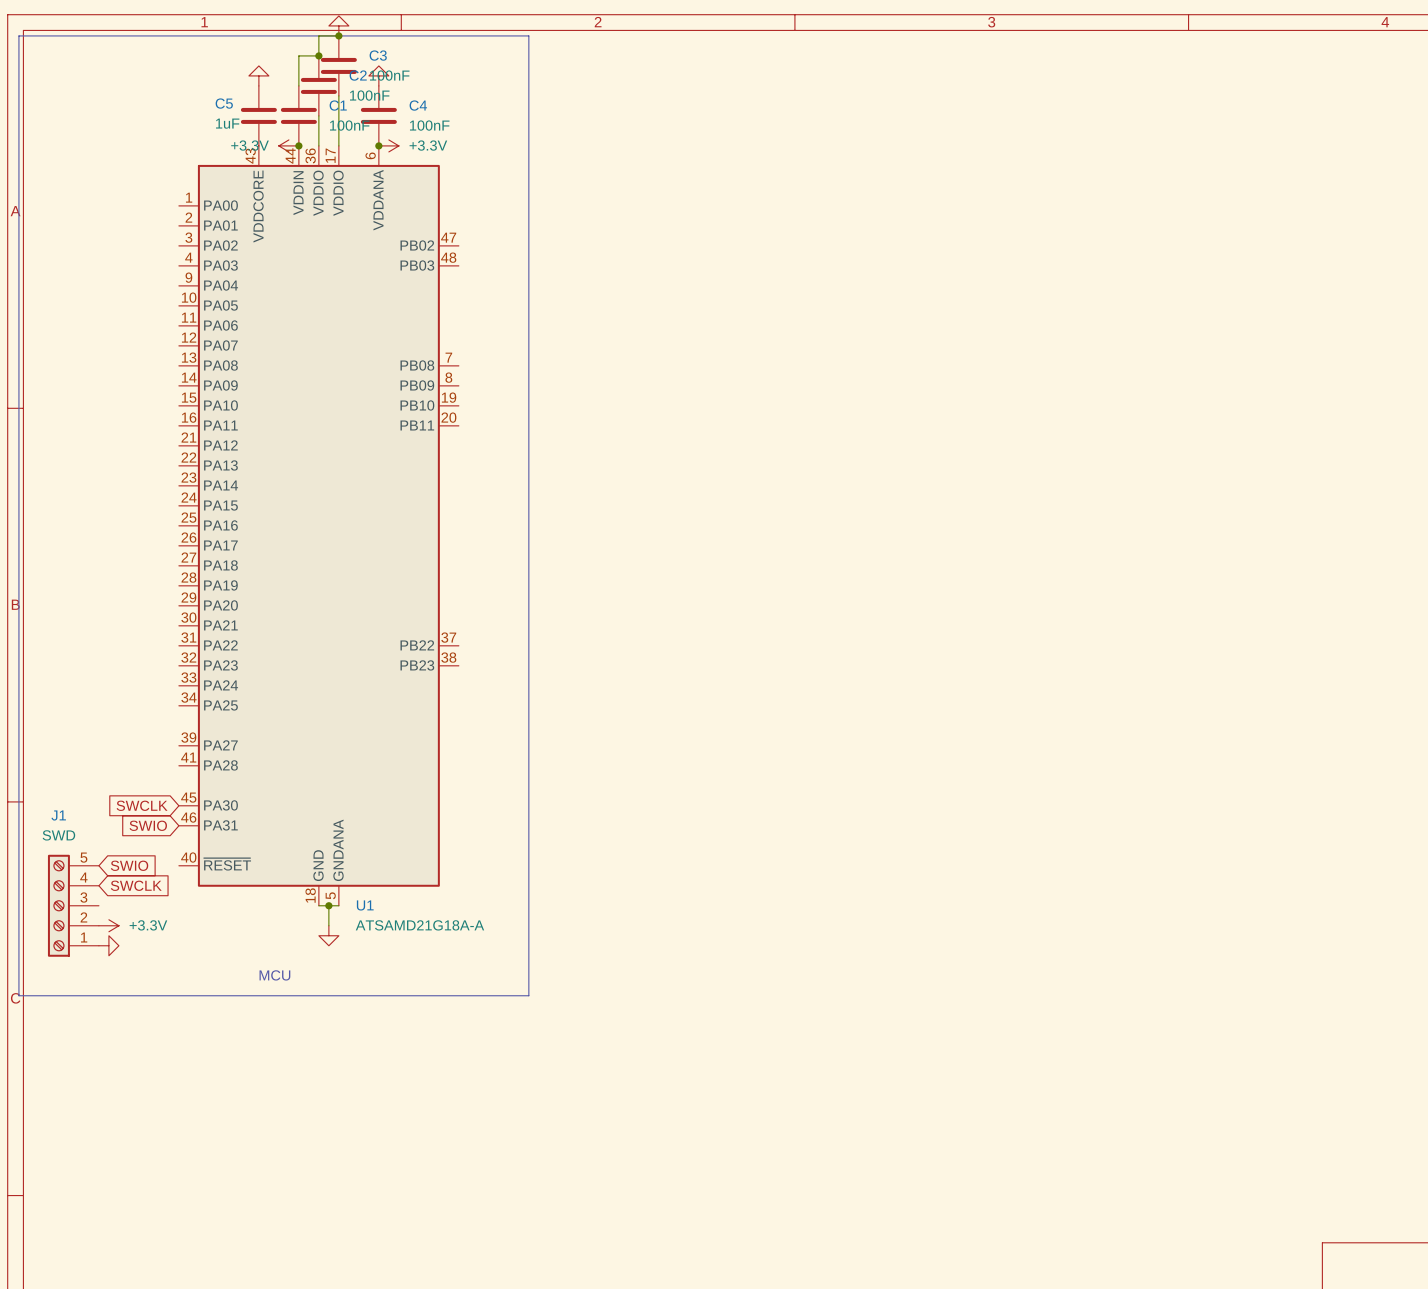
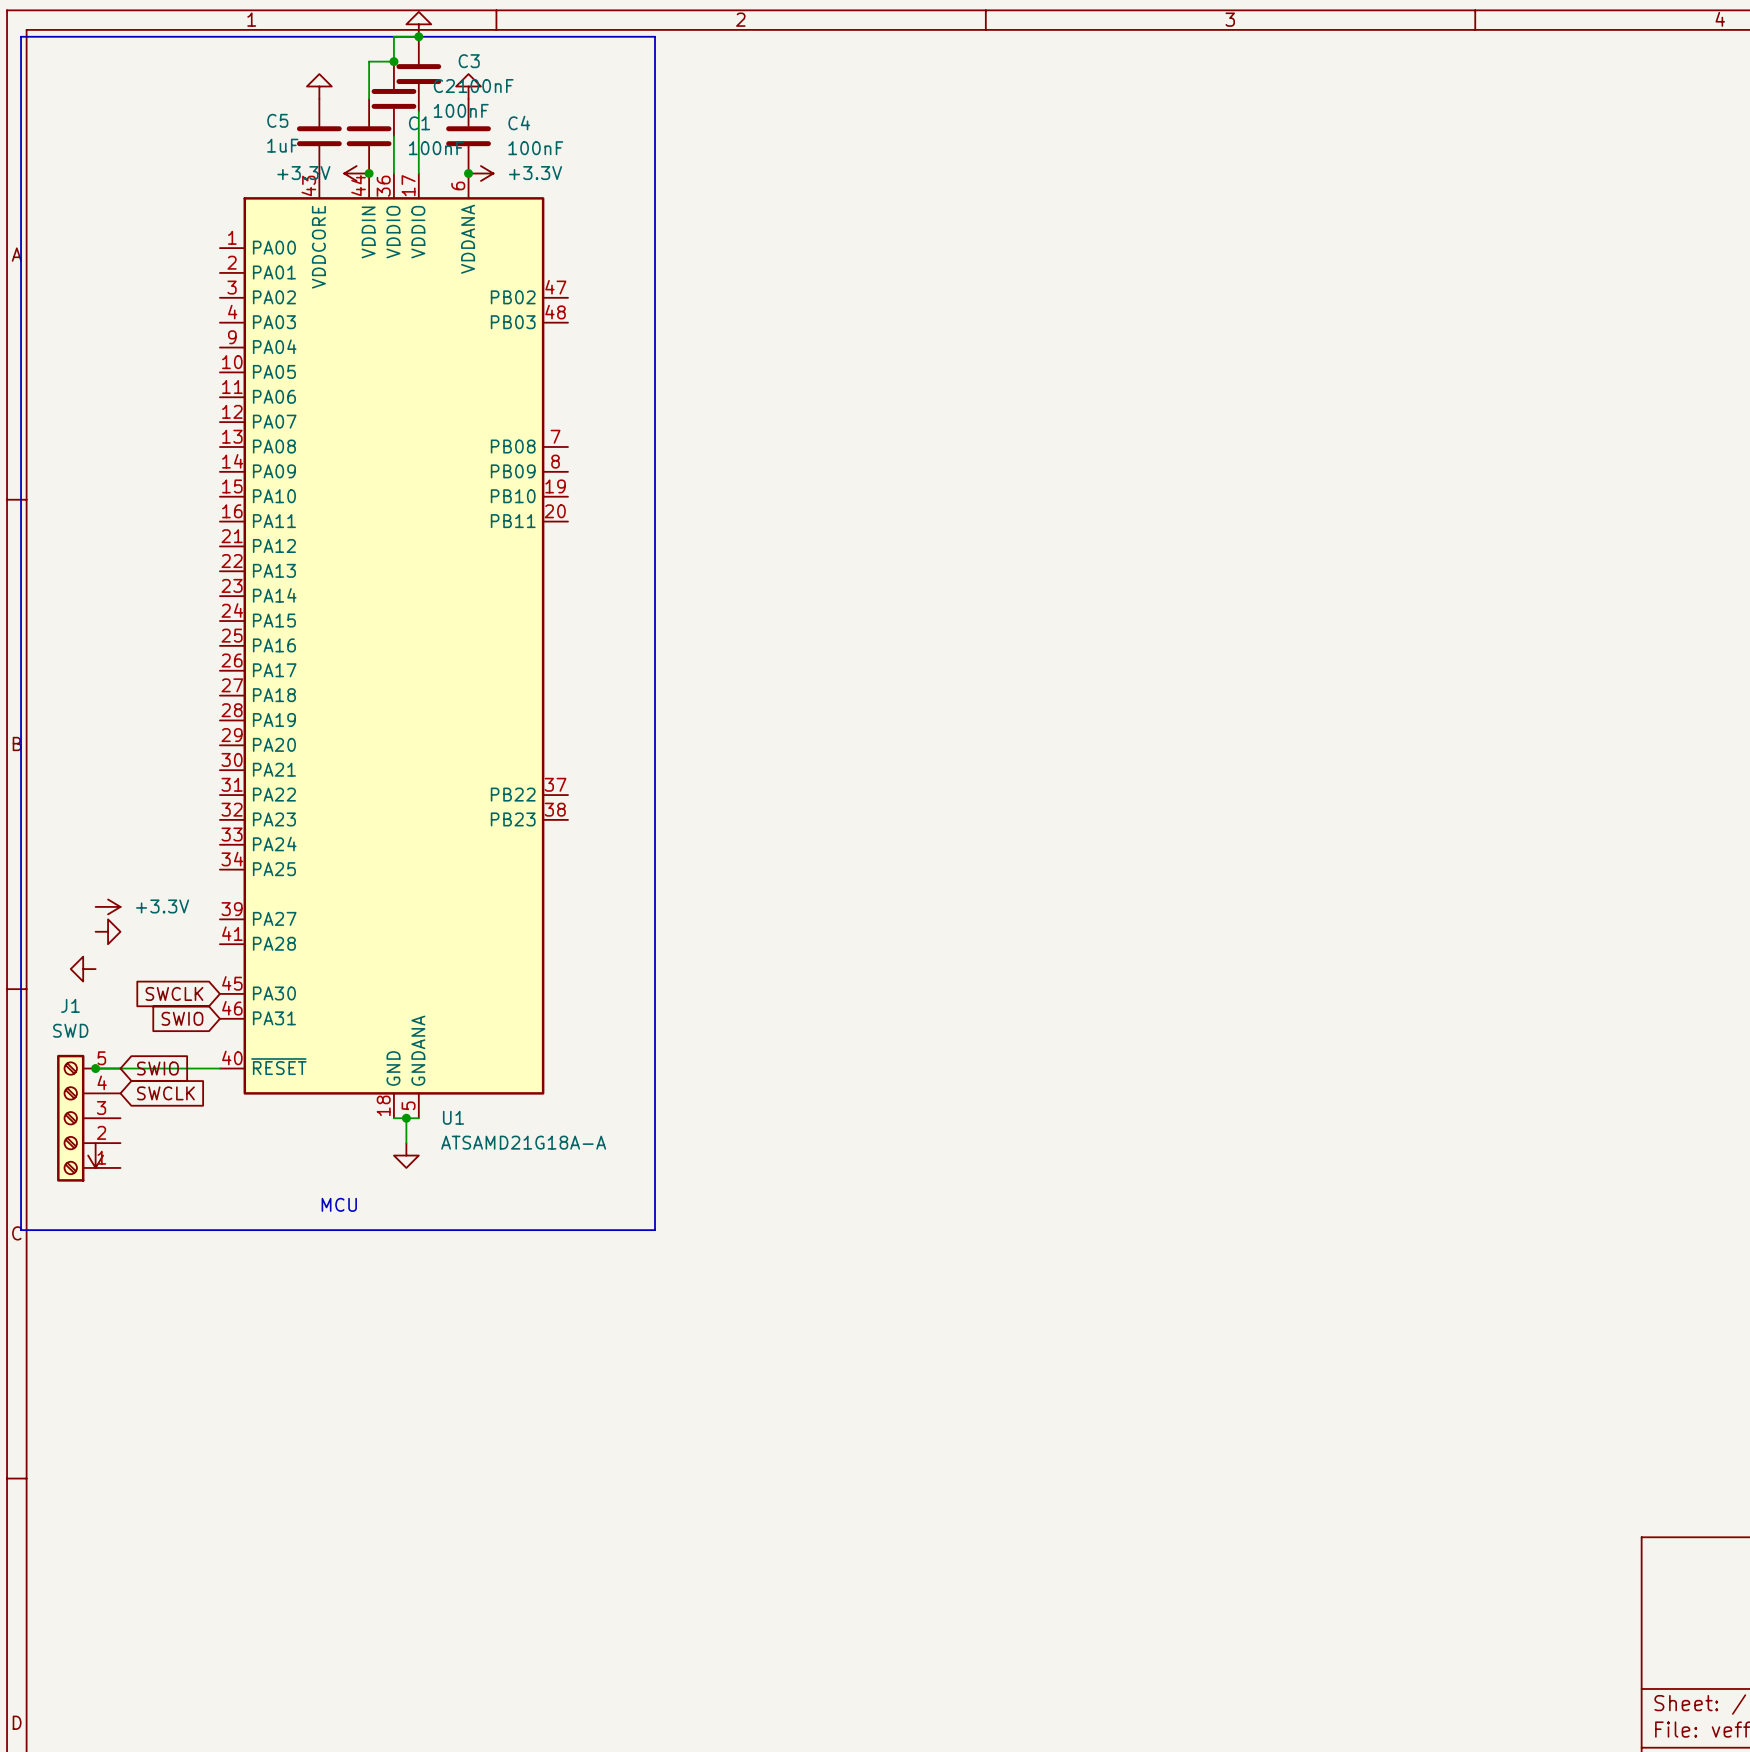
power symbol: none -> (108, 931)
power symbol: none -> (83, 969)
wire: none -> (95, 1068) (219, 1068)
junction: none -> (95, 1068)
power symbol position: +3.3V (108, 925) -> +3.3V (108, 906)
power symbol: none -> (95, 1155)
power symbol: (108, 945) -> none

